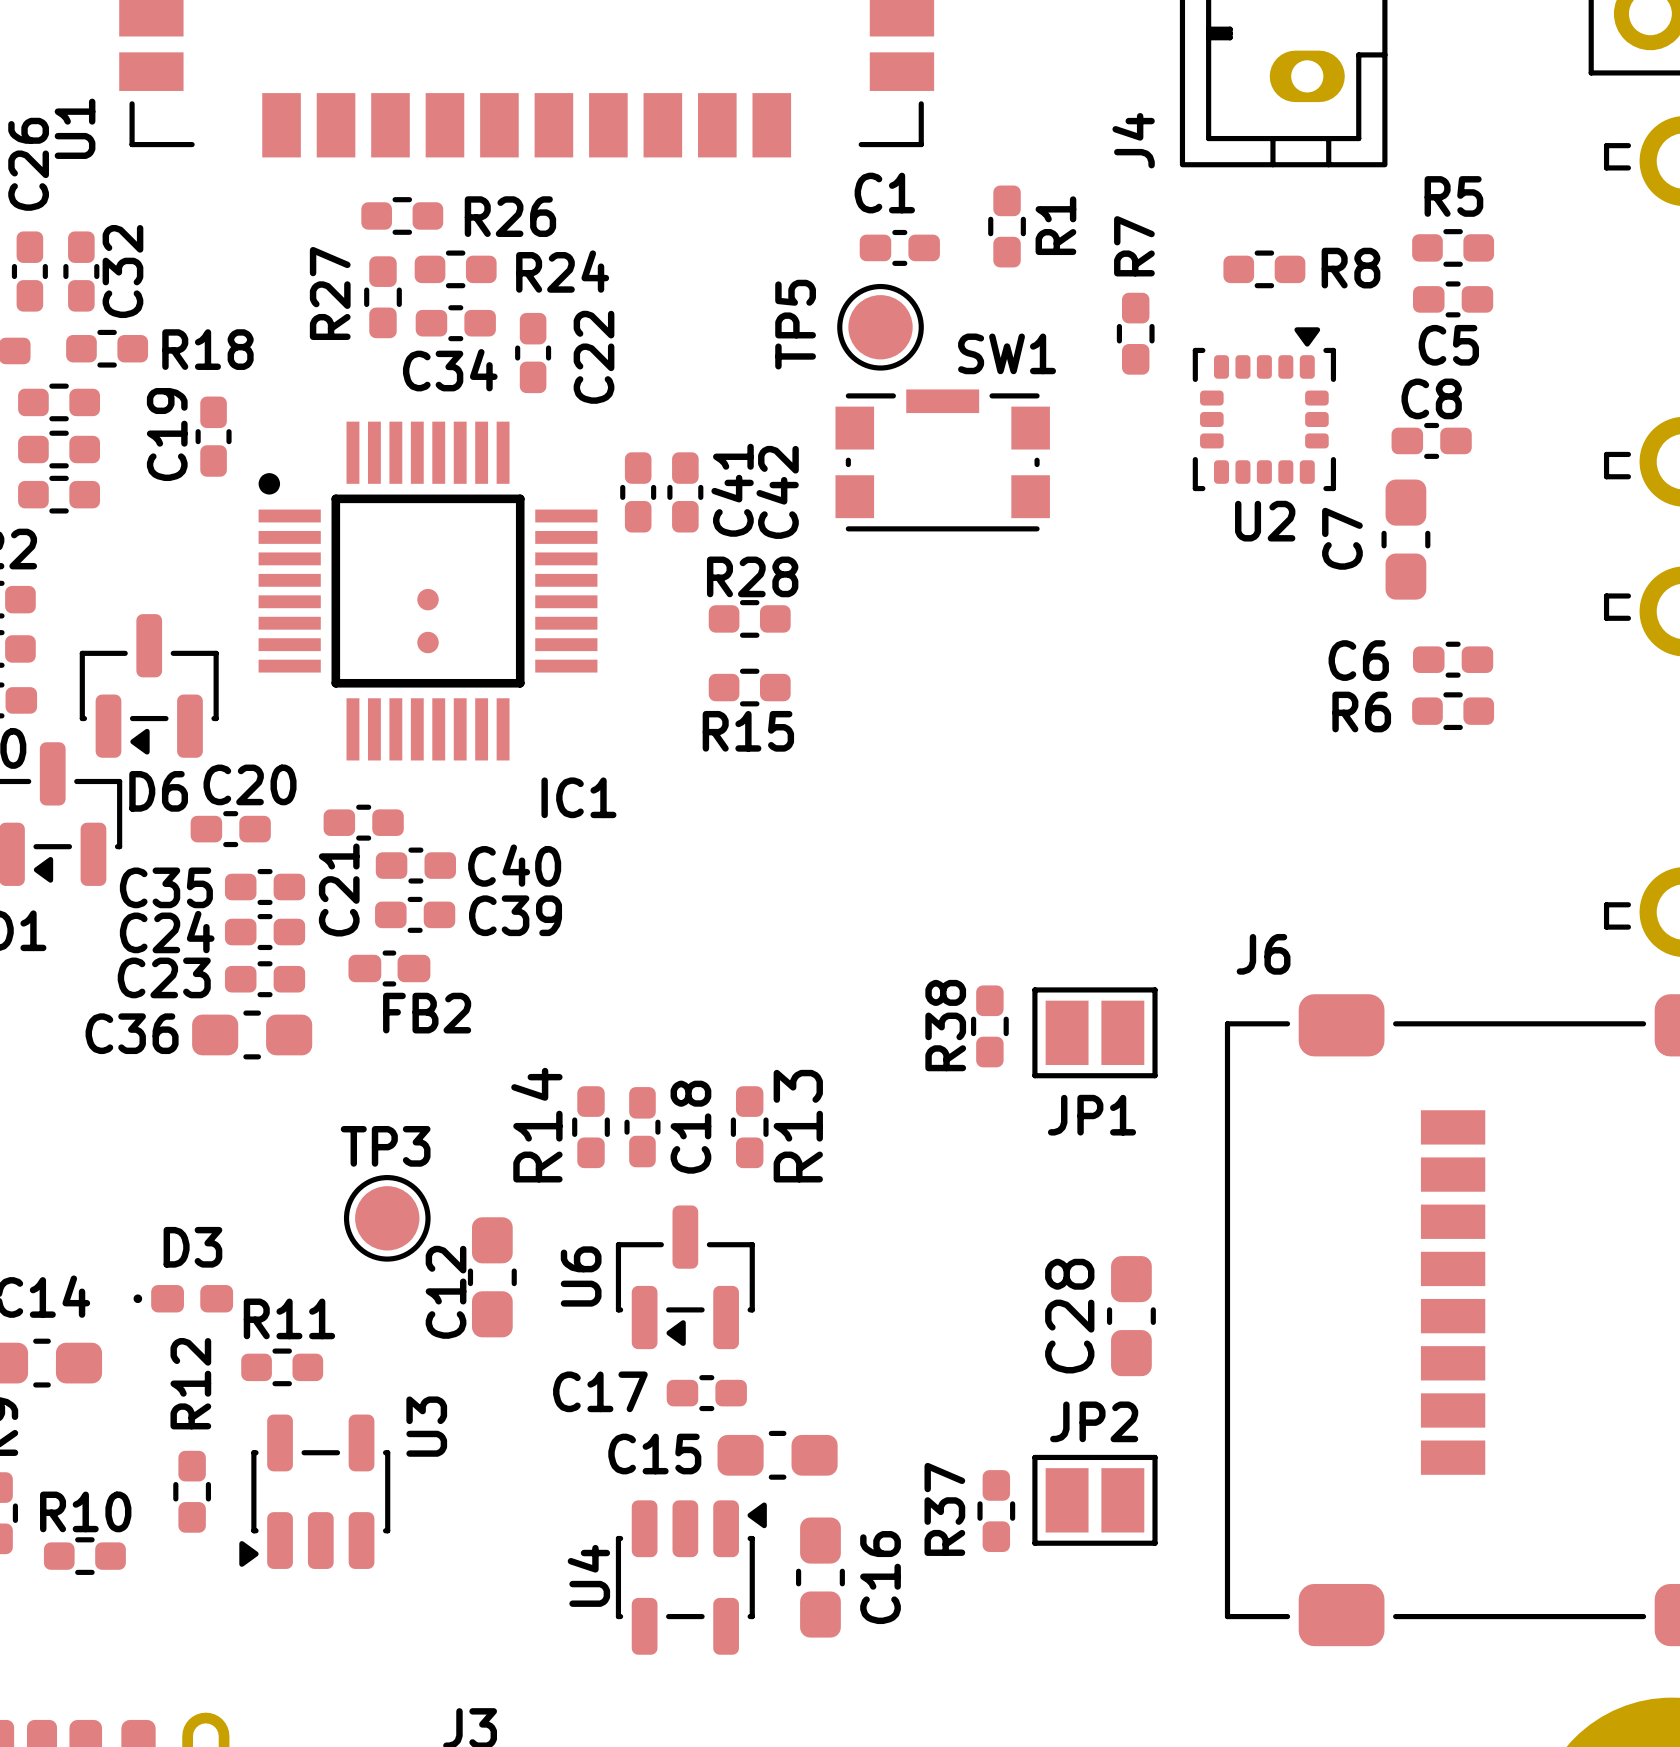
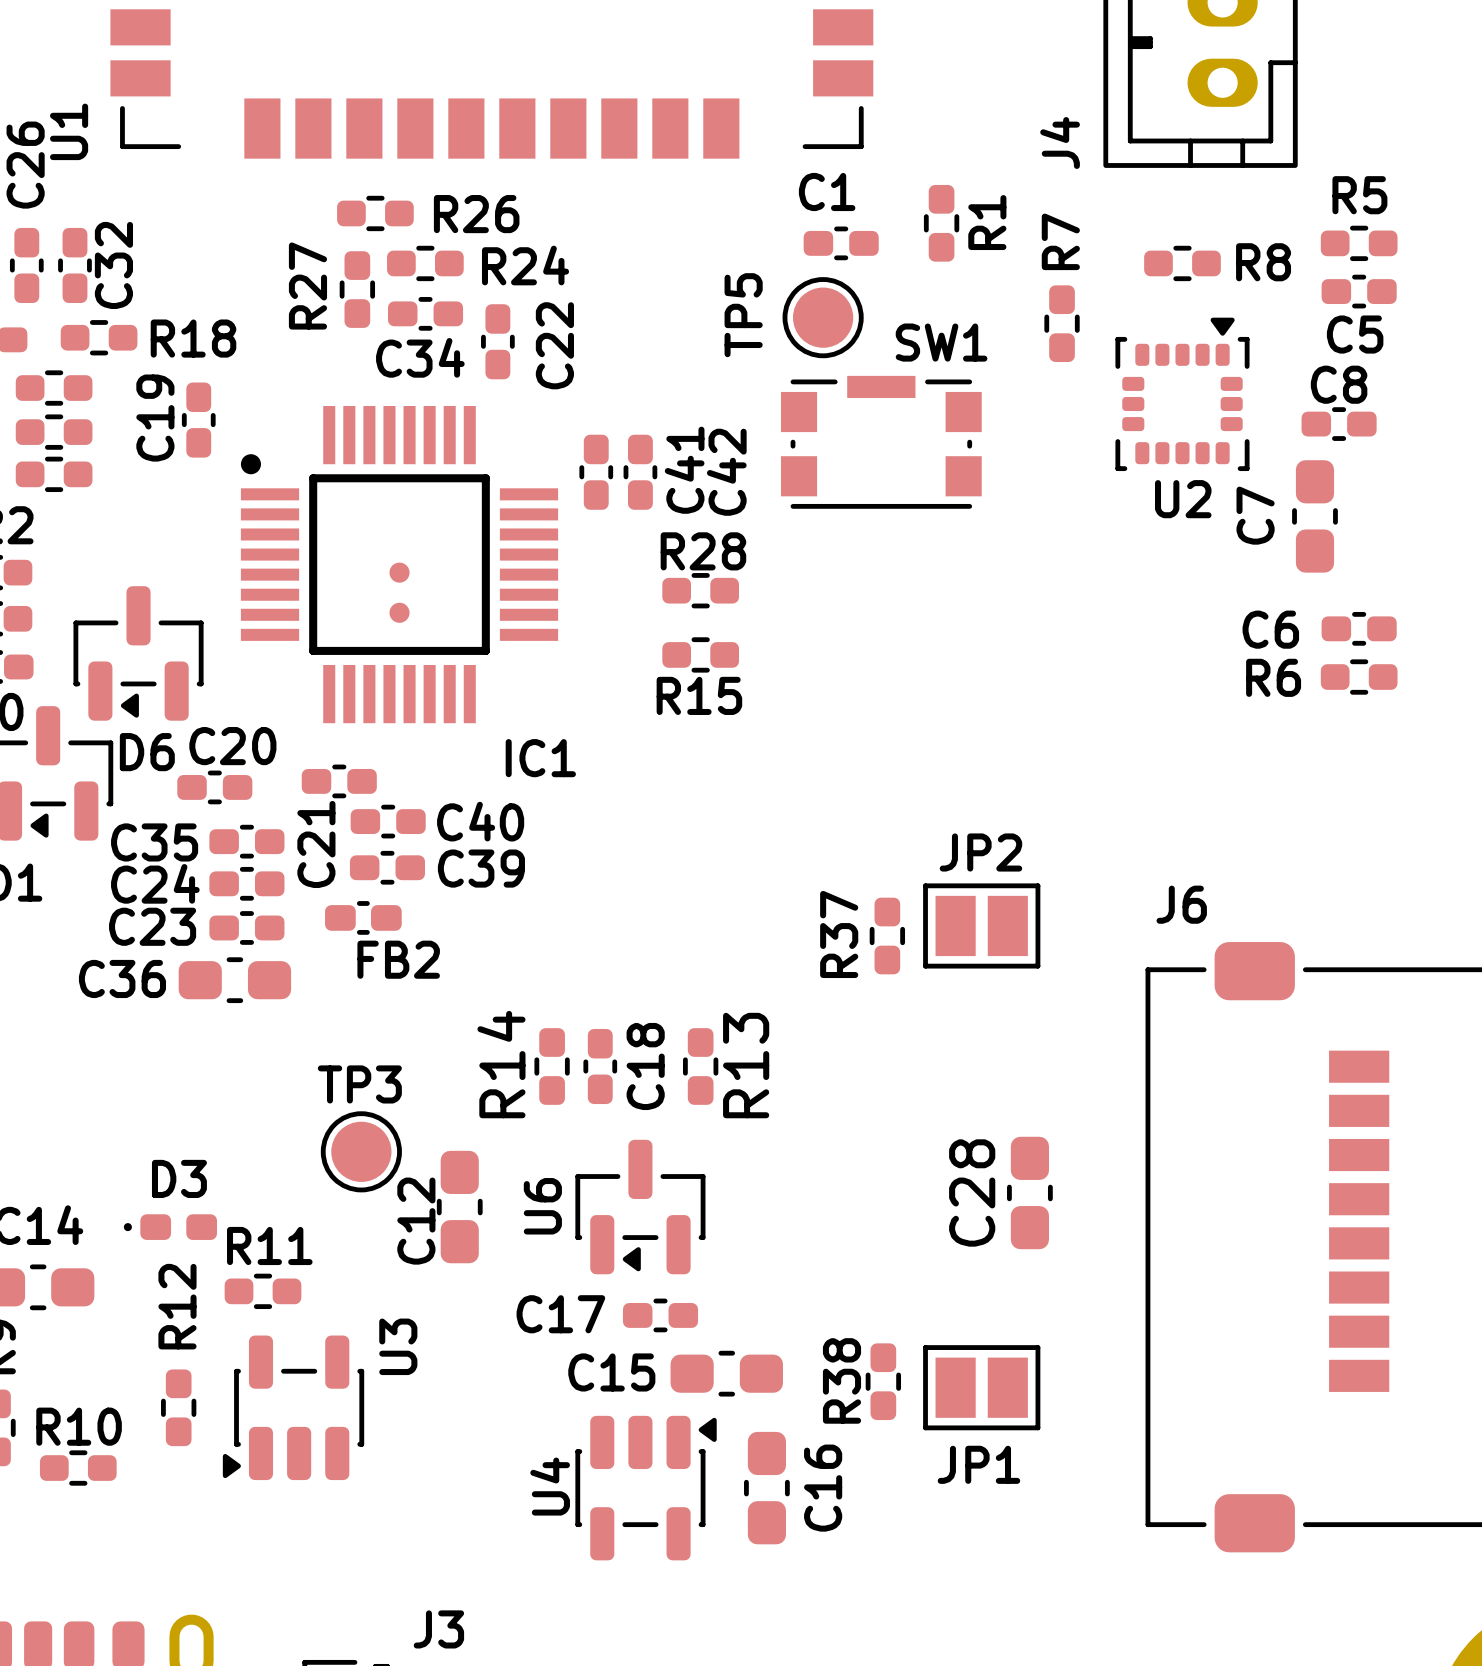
R38 position: (989, 1026) -> (883, 1381)
JP1 position: (1094, 1032) -> (981, 1387)
C28 position: (1131, 1316) -> (1029, 1192)
JP2 position: (1094, 1500) -> (981, 925)
R37 position: (996, 1511) -> (887, 936)

